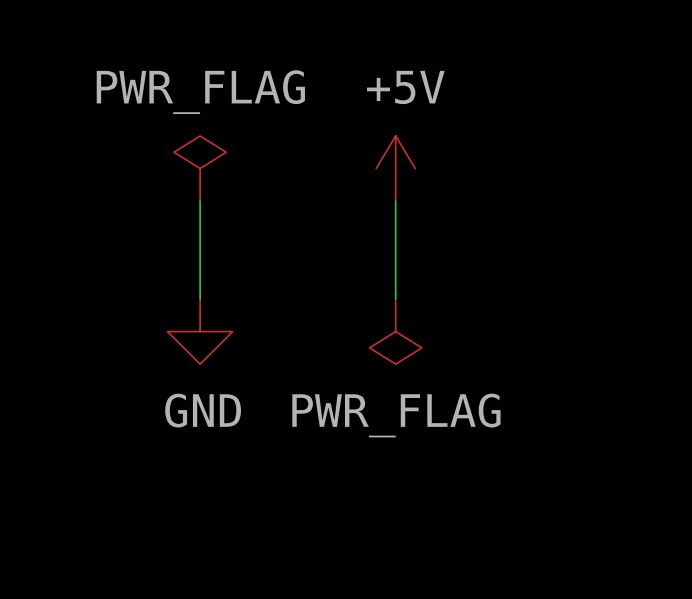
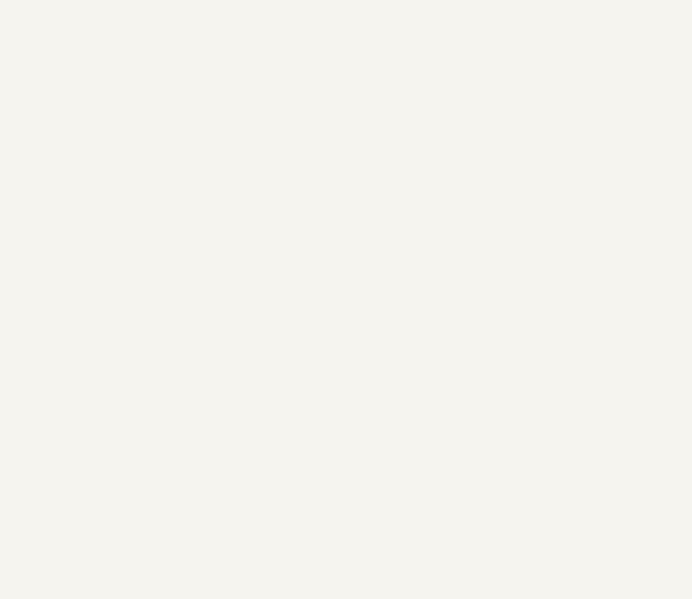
power symbol: PWR_FLAG (200, 168) -> none
power symbol: +5V (395, 168) -> none
wire: (200, 201) (200, 298) -> none
wire: (395, 201) (395, 298) -> none
power symbol: GND (200, 331) -> none
power symbol: PWR_FLAG (395, 331) -> none

